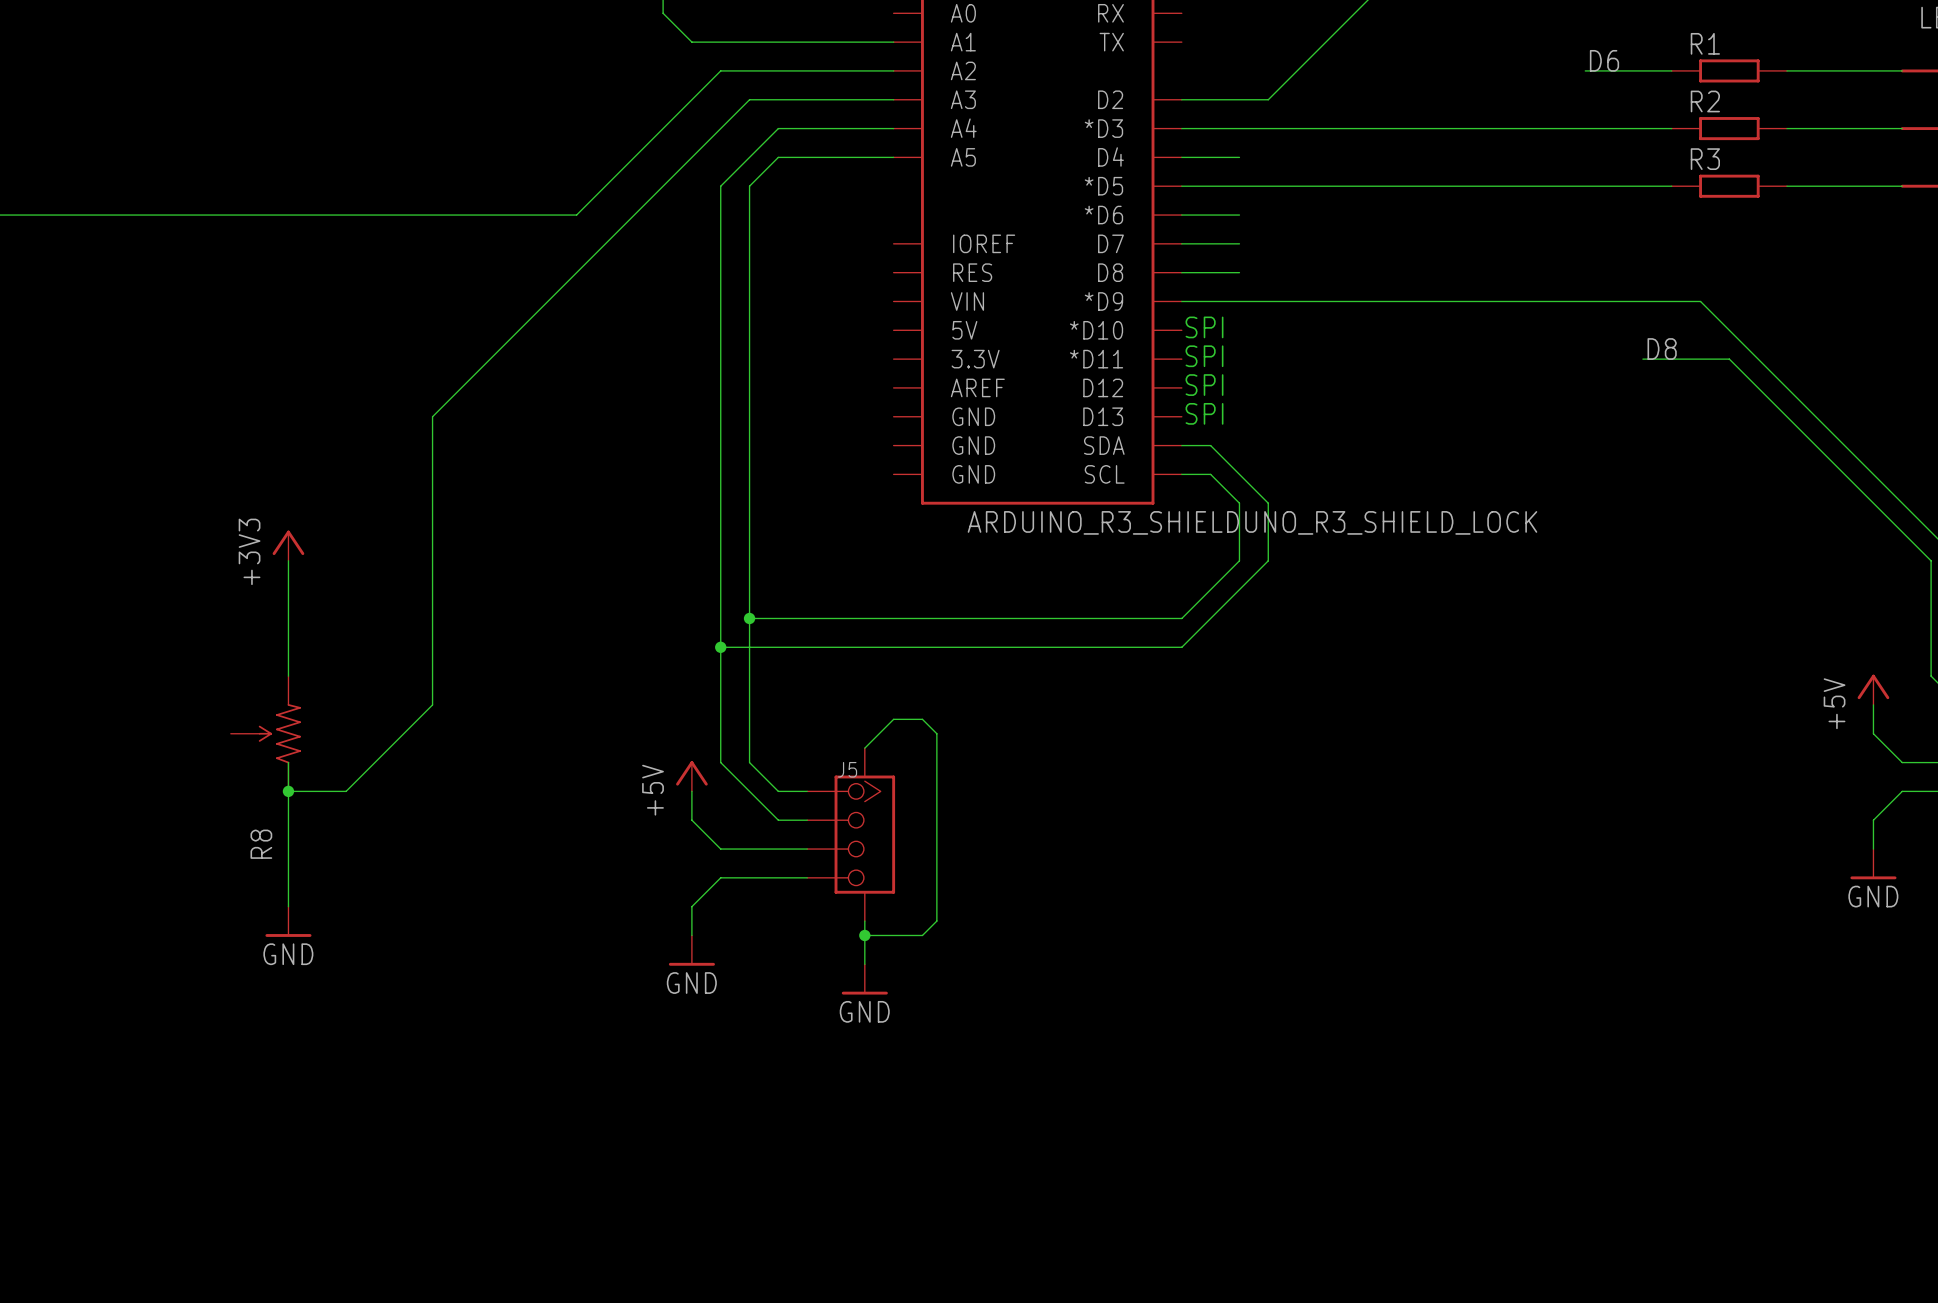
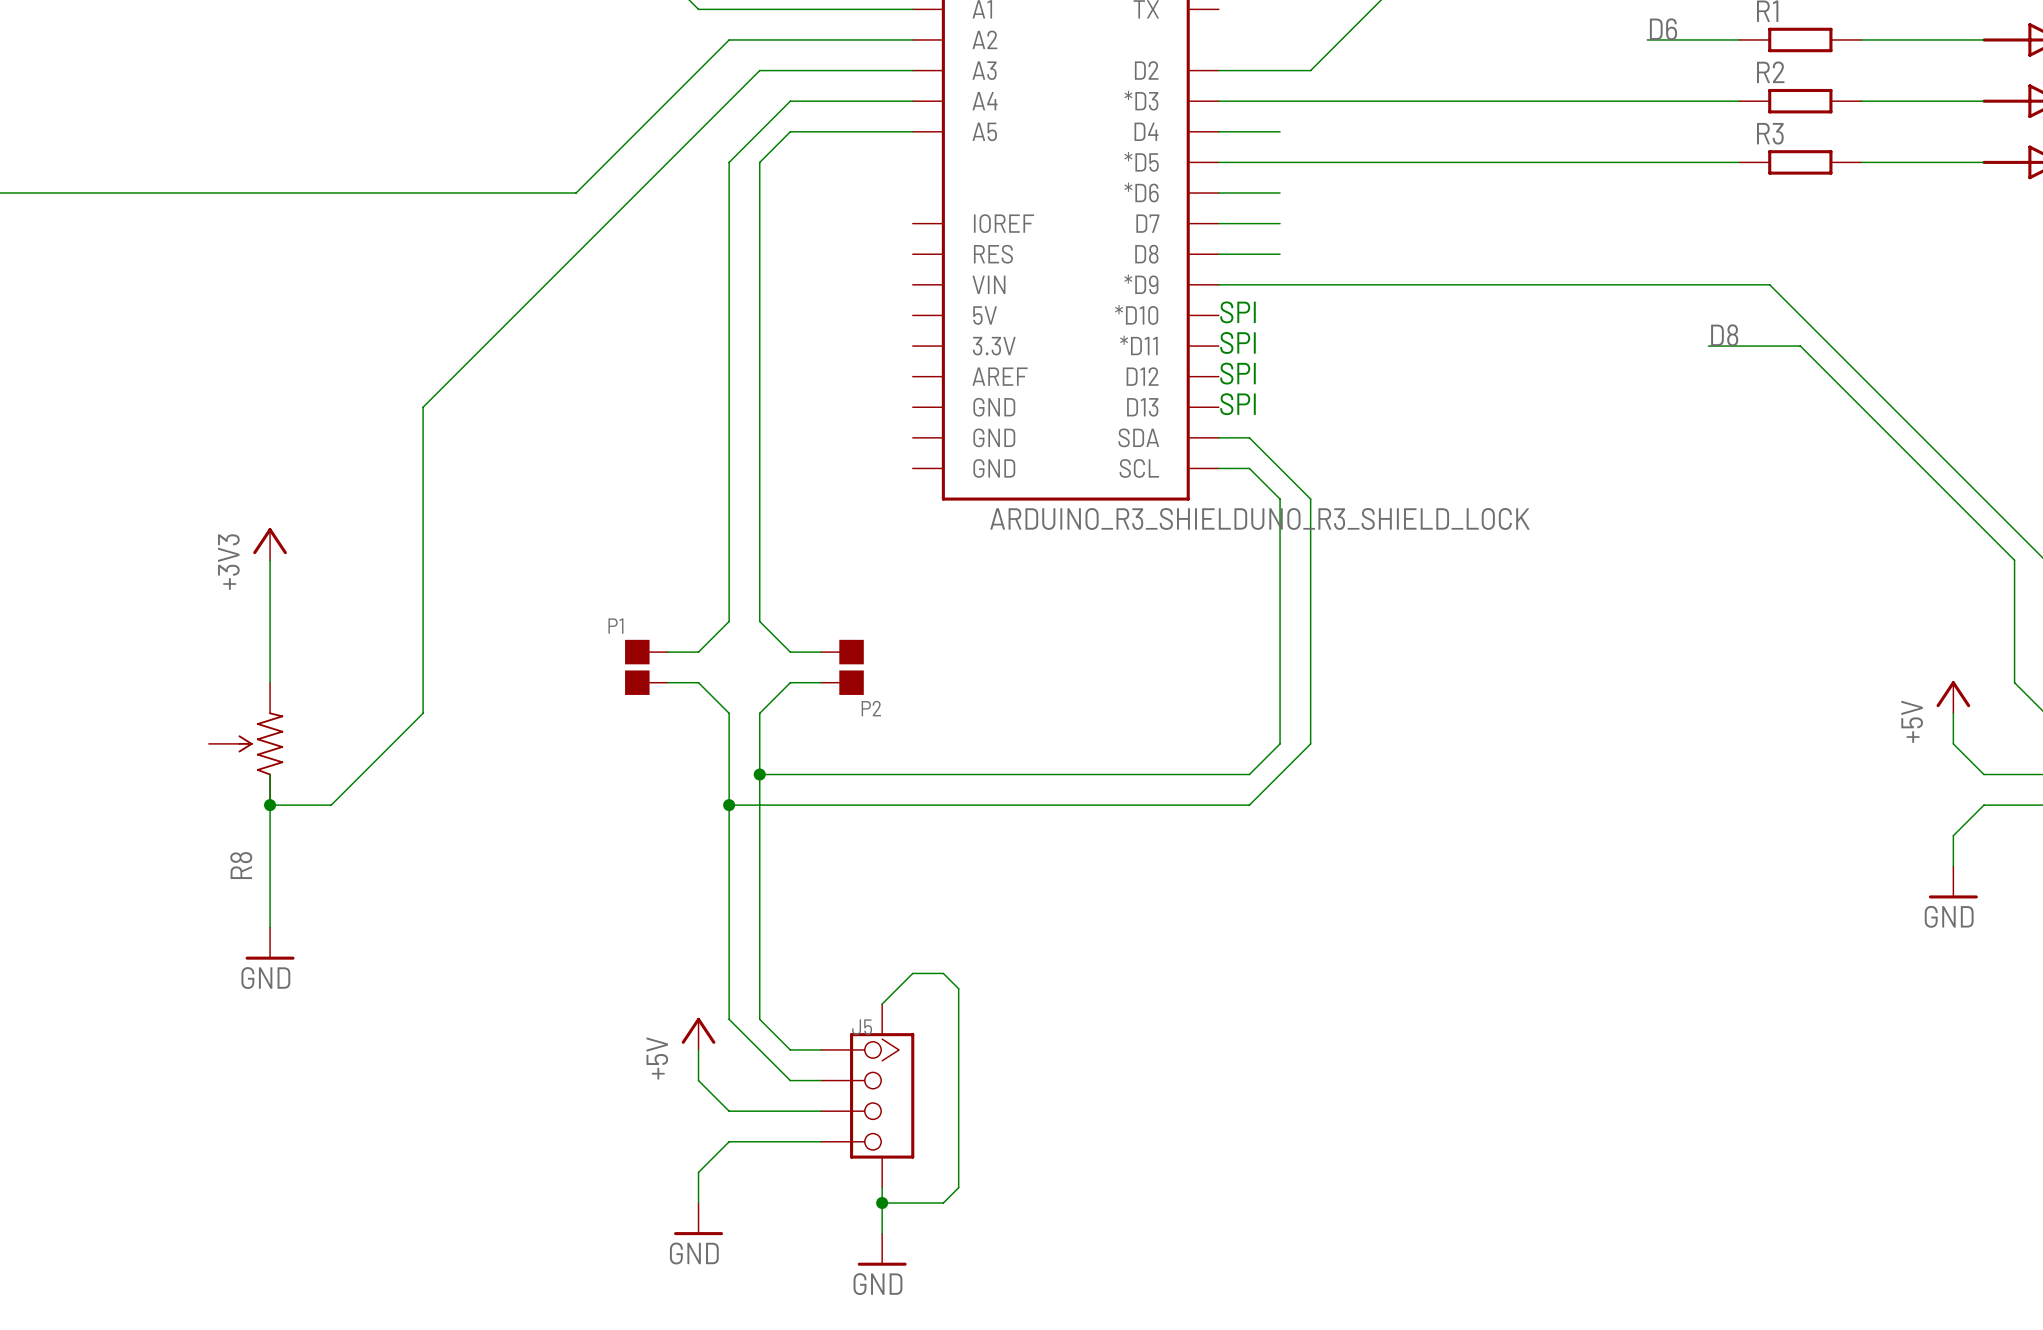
wire: (1239, 560) (1181, 618) (749, 618) (749, 704) -> (1280, 560) (1280, 743) (1249, 774) (759, 774) (759, 1019) (790, 1049) (820, 1049)
wire: (1268, 560) (1181, 647) (807, 647) -> (1310, 560) (1310, 743) (1249, 805) (820, 805)
wire: (720, 618) (720, 704) -> (729, 621) (698, 652) (667, 652)
junction: (749, 618) -> none
wire: (720, 647) (778, 647) -> (759, 621) (790, 652)
junction: (720, 647) -> none
P1: none -> (646, 667)
P2: none -> (842, 667)
wire: none -> (667, 682) (698, 682) (729, 713)
wire: none -> (820, 682) (790, 682) (759, 713)
wire: (864, 748) (893, 719) (922, 719) (936, 733) (936, 921) (922, 935) (864, 935) -> (882, 1004) (912, 973) (943, 973) (958, 988) (958, 1187) (943, 1202) (882, 1202)
wire: (720, 762) (778, 820) (807, 820) -> (729, 774) (729, 1019) (790, 1080) (820, 1080)
wire: (749, 762) (778, 791) -> (729, 805) (790, 805)
junction: none -> (759, 774)
power symbol position: +5V (691, 776) -> +5V (698, 1033)
wire: (691, 791) (691, 820) (720, 849) (807, 849) -> (698, 1049) (698, 1080) (729, 1111) (820, 1111)
junction: none -> (729, 805)
J5 position: (851, 834) -> (867, 1095)
wire: (807, 877) (720, 877) (691, 906) (691, 935) -> (820, 1141) (729, 1141) (698, 1172) (698, 1202)
wire: (864, 921) (864, 964) -> (882, 1187) (882, 1233)
junction: (864, 935) -> none
power symbol: GND (691, 950) -> none
power symbol: GND (864, 979) -> none
junction: none -> (882, 1202)
power symbol: none -> GND (698, 1219)
power symbol: none -> GND (882, 1249)

